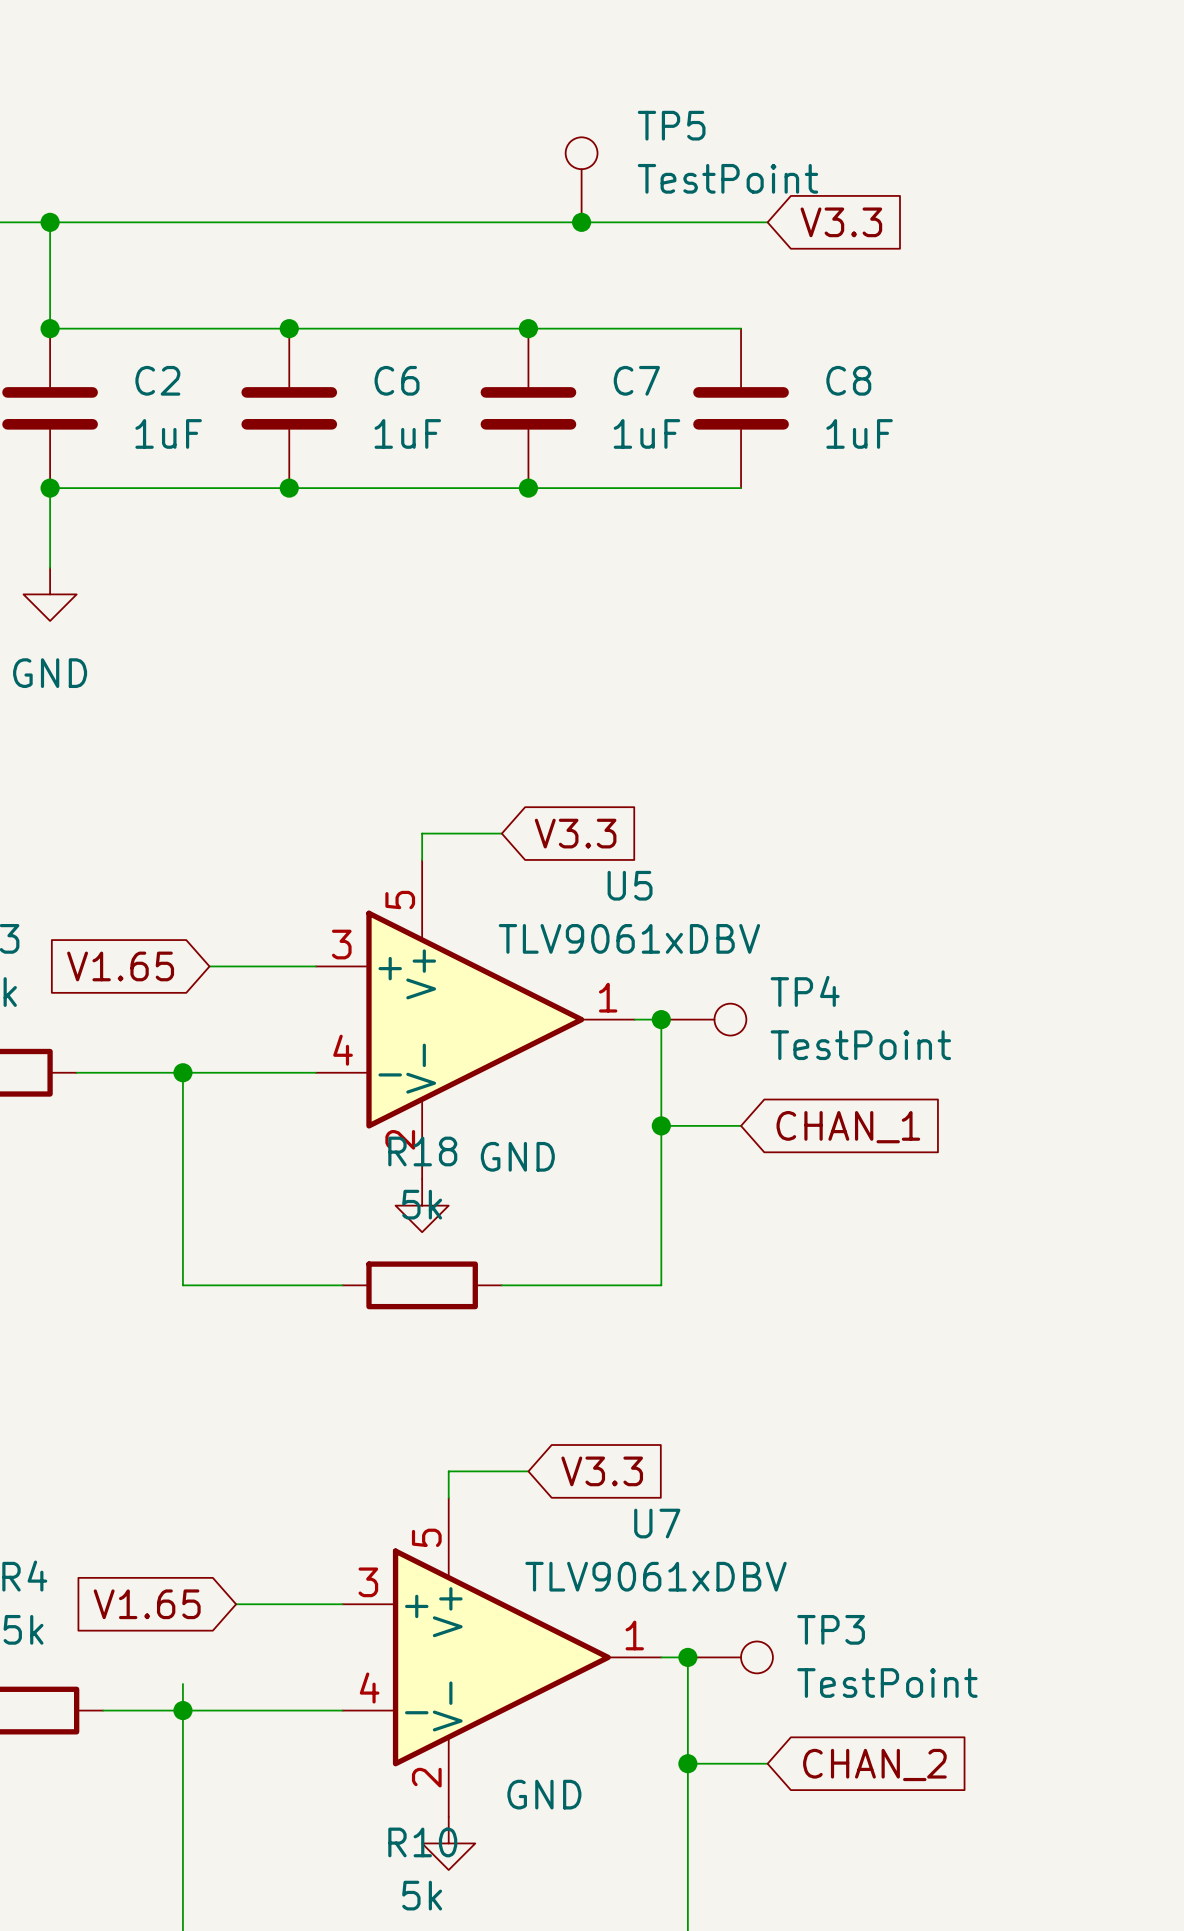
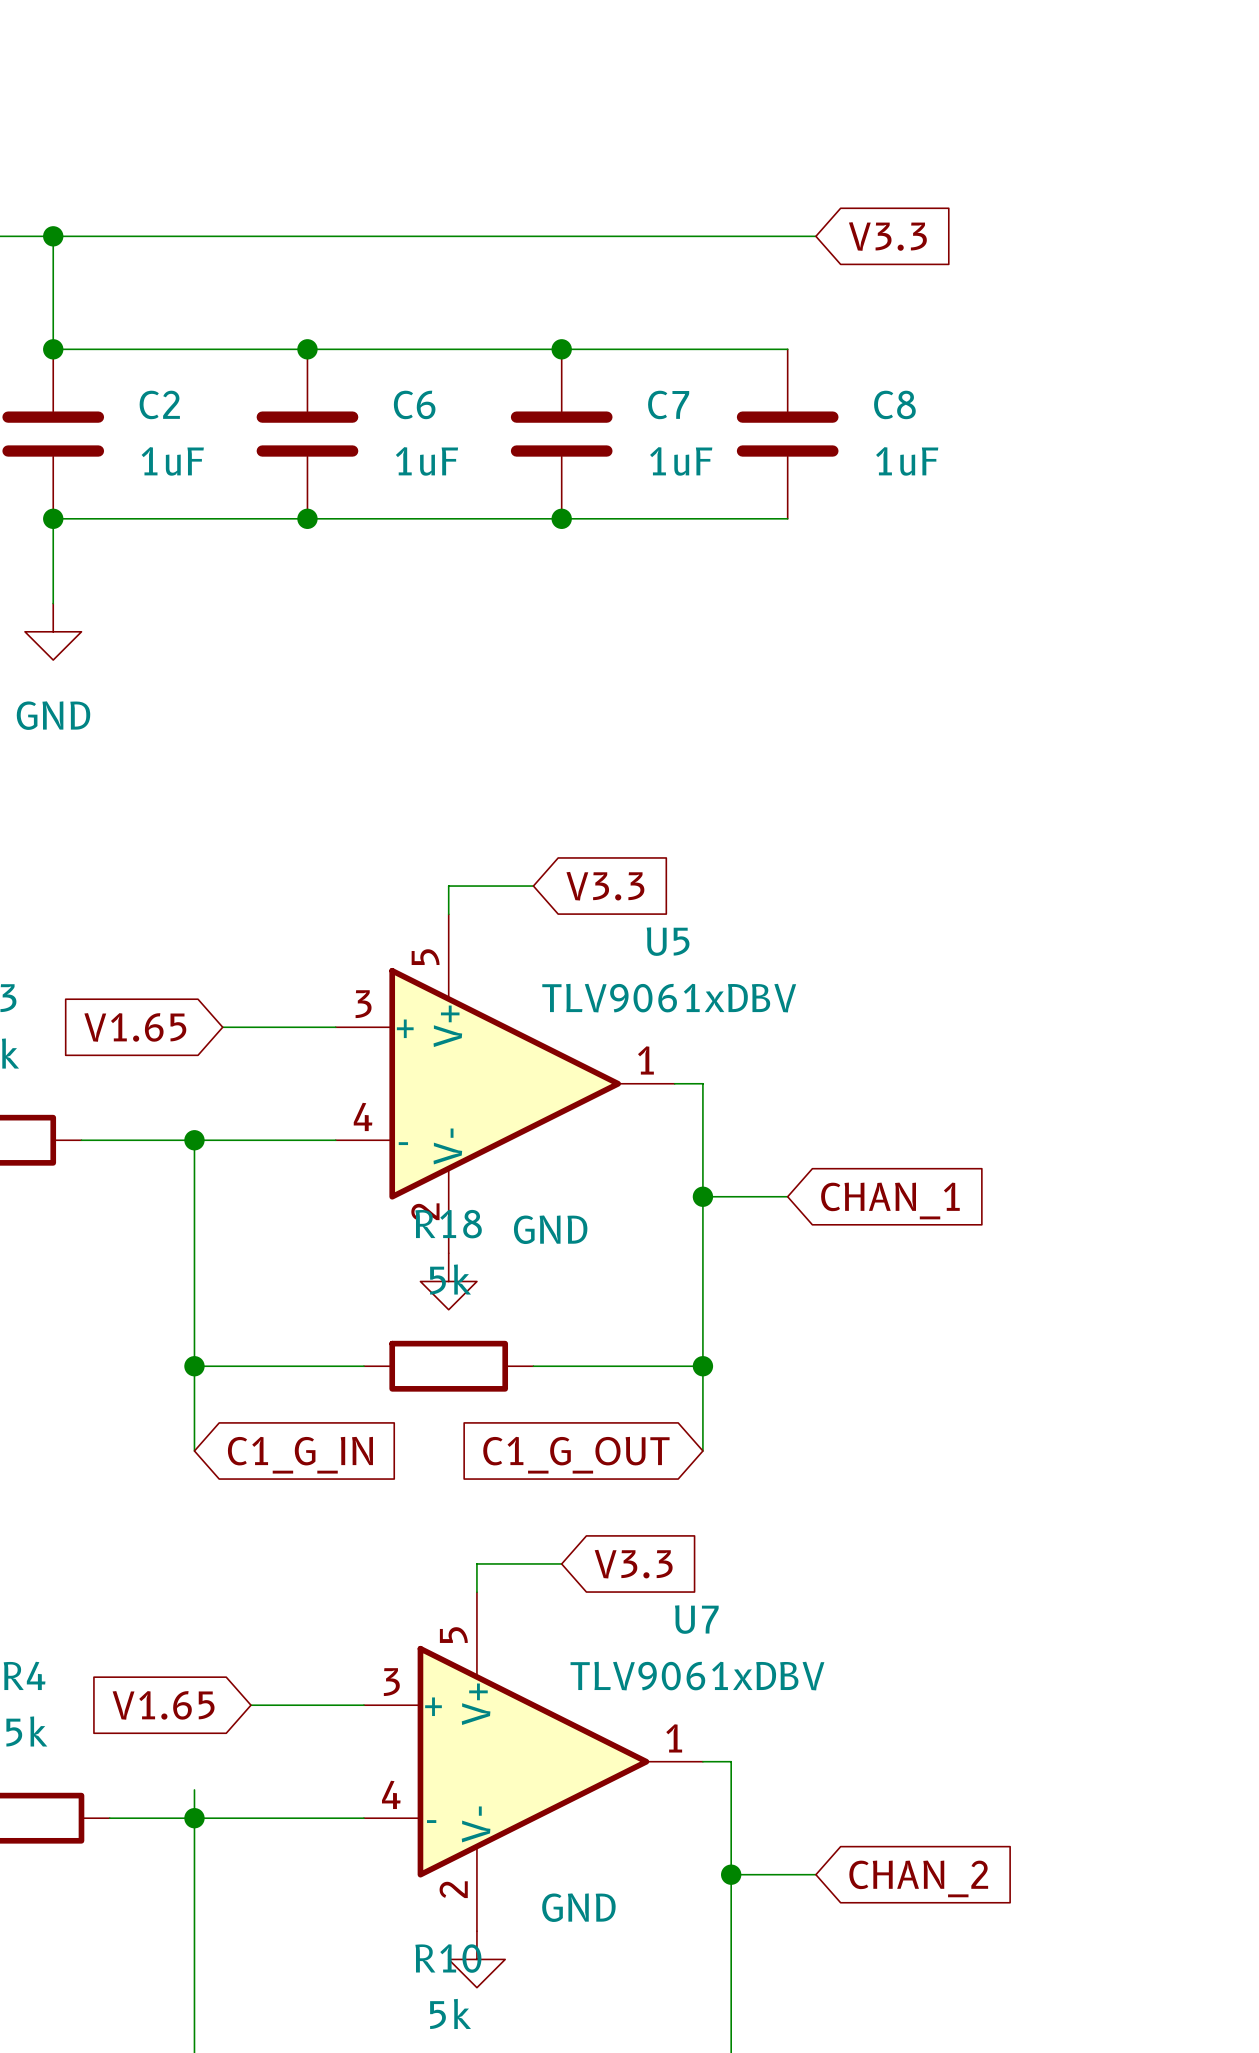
TP5: TestPoint (581, 179) -> none
junction: (581, 222) -> none
junction: (661, 1019) -> none
TP4: TestPoint (703, 1019) -> none
wire: none -> (194, 1366) (194, 1450)
junction: none -> (194, 1366)
wire: none -> (702, 1366) (702, 1450)
junction: none -> (702, 1366)
global label: none -> C1_G_IN (300, 1455)
global label: none -> C1_G_OUT (576, 1455)
junction: (687, 1657) -> none
TP3: TestPoint (730, 1657) -> none

